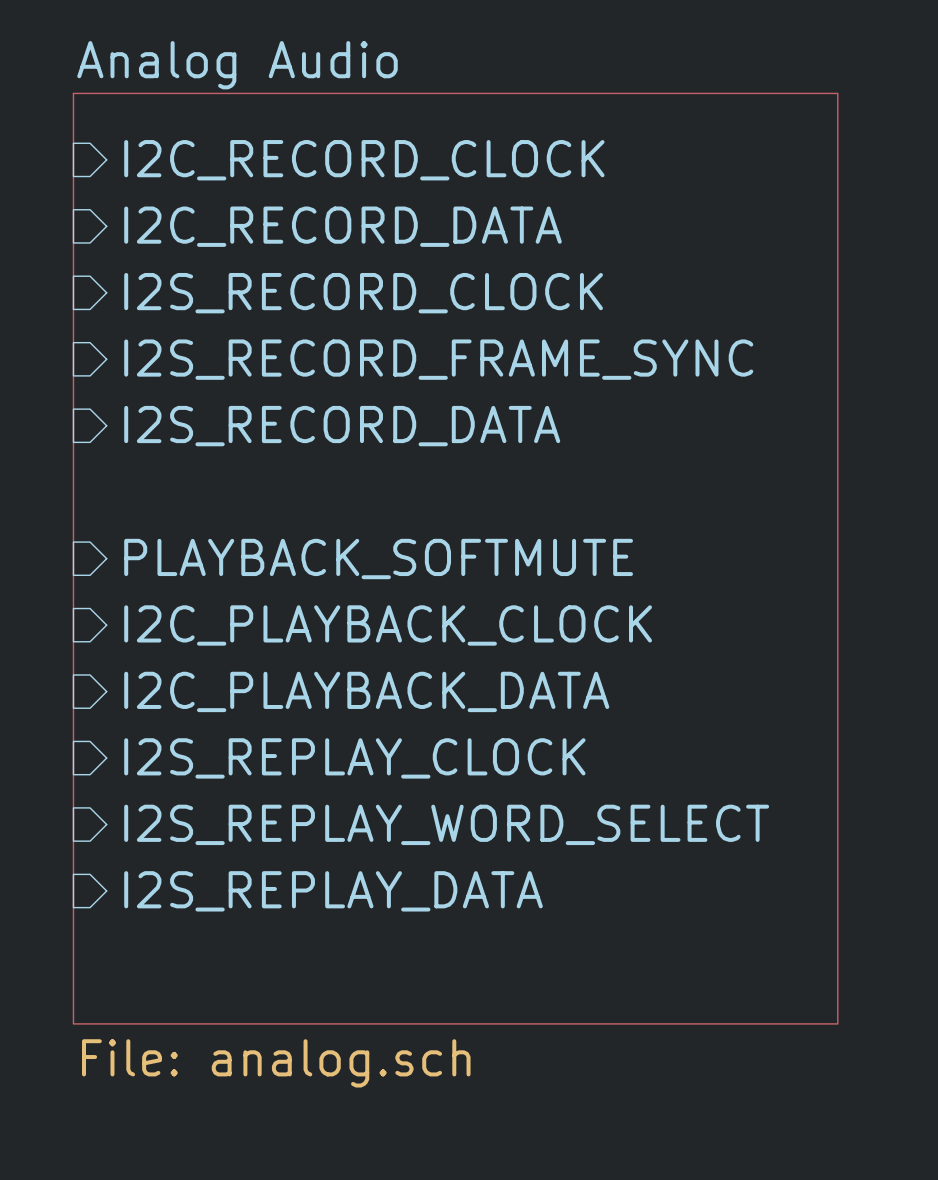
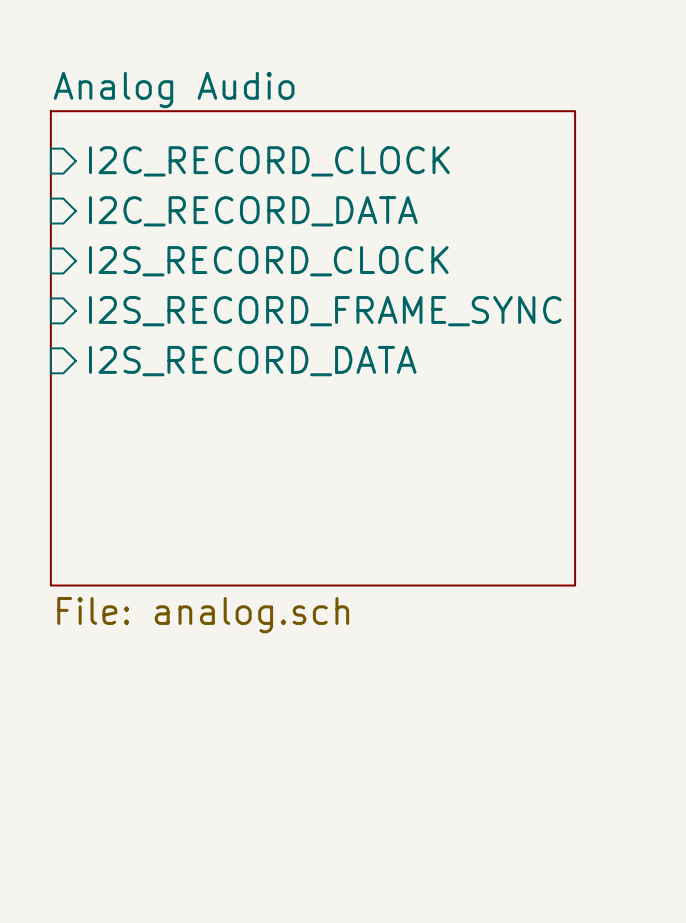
sheet Analog Audio: none -> File: analog.sch (312, 348)
sheet Analog Audio: File: analog.sch (455, 558) -> none
sheet pin: PLAYBACK_SOFTMUTE (378, 559) -> none
sheet pin: I2C_PLAYBACK_CLOCK (388, 625) -> none
sheet pin: I2C_PLAYBACK_DATA (366, 691) -> none
sheet pin: I2S_REPLAY_CLOCK (354, 758) -> none
sheet pin: I2S_REPLAY_WORD_SELECT (446, 824) -> none
sheet pin: I2S_REPLAY_DATA (333, 891) -> none

